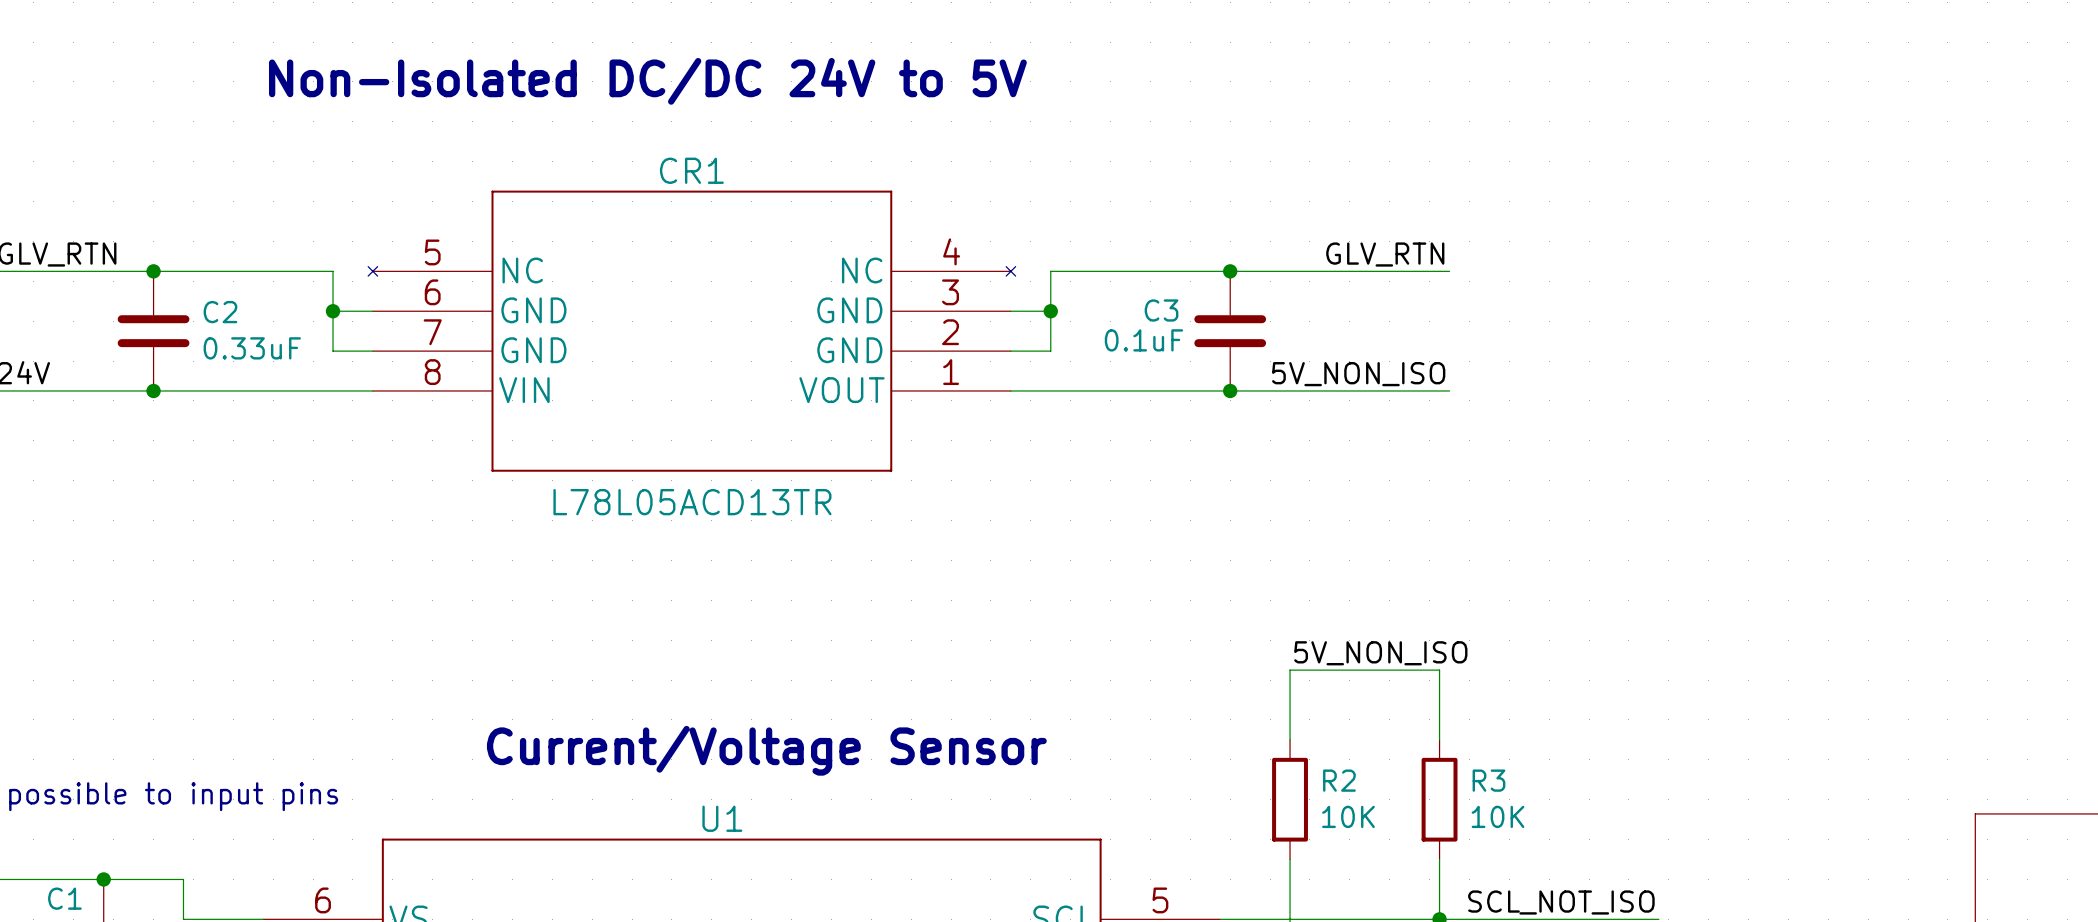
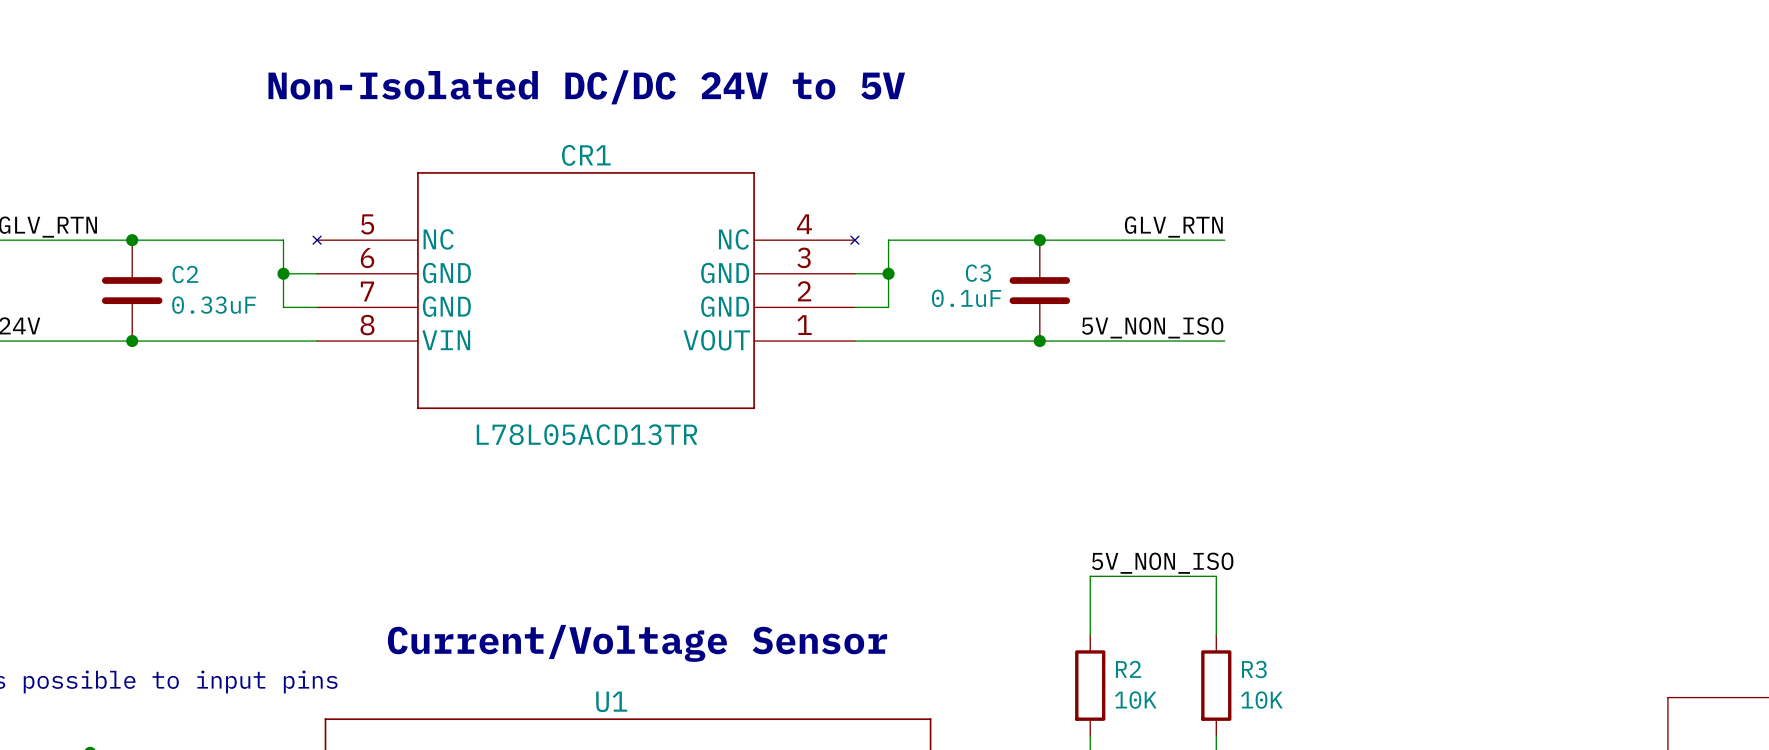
text position: Non-Isolated DC/DC 24V to 5V (647, 81) -> Non-Isolated DC/DC 24V to 5V (586, 87)

